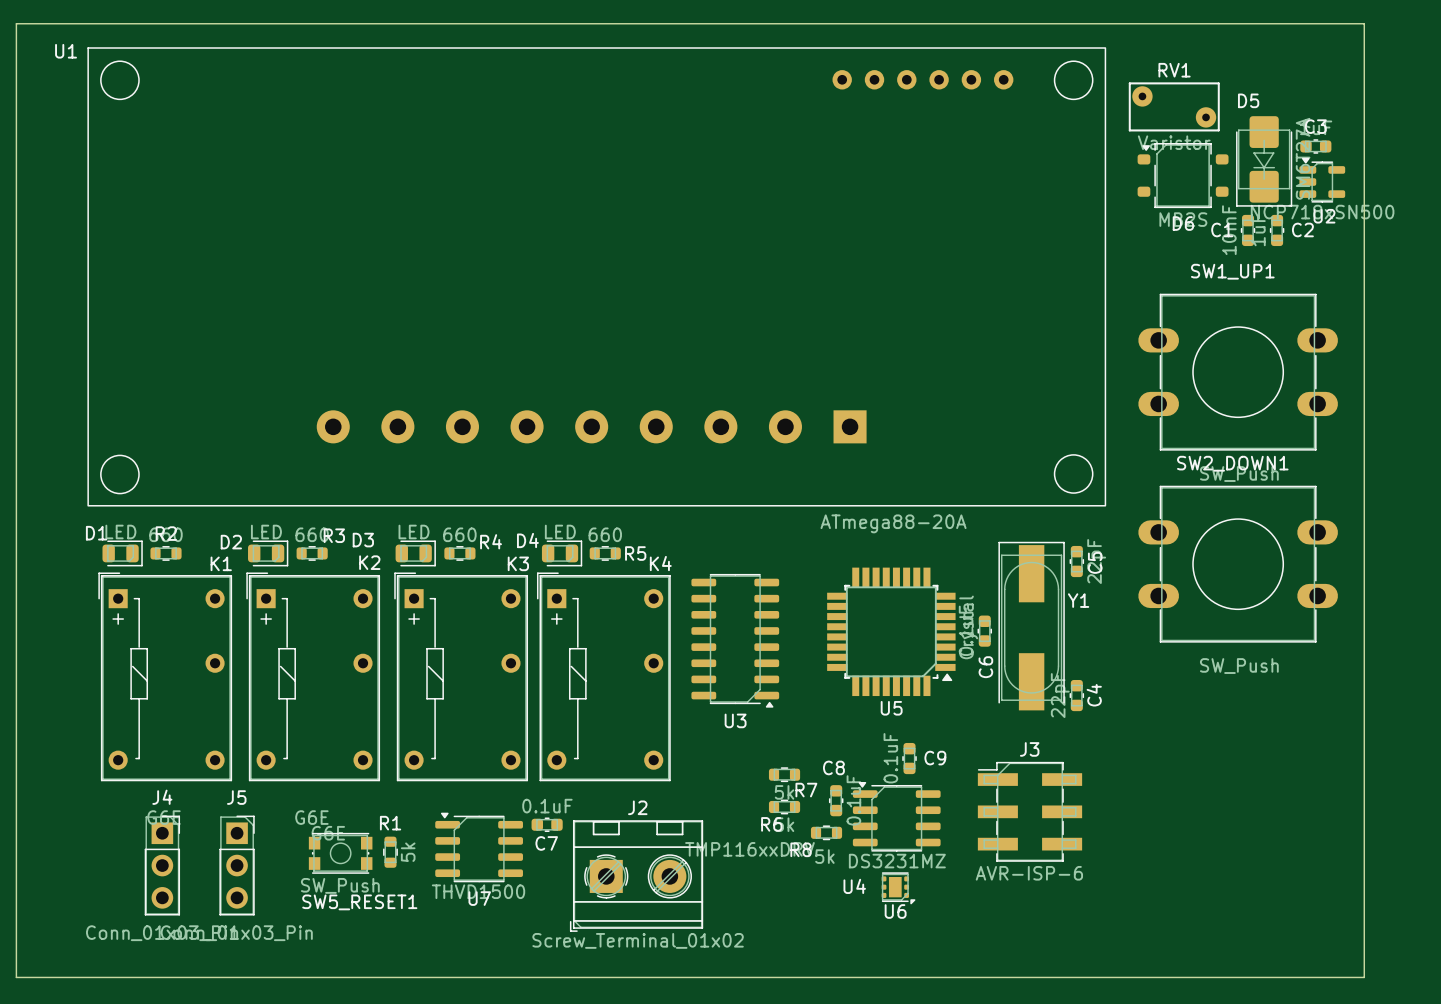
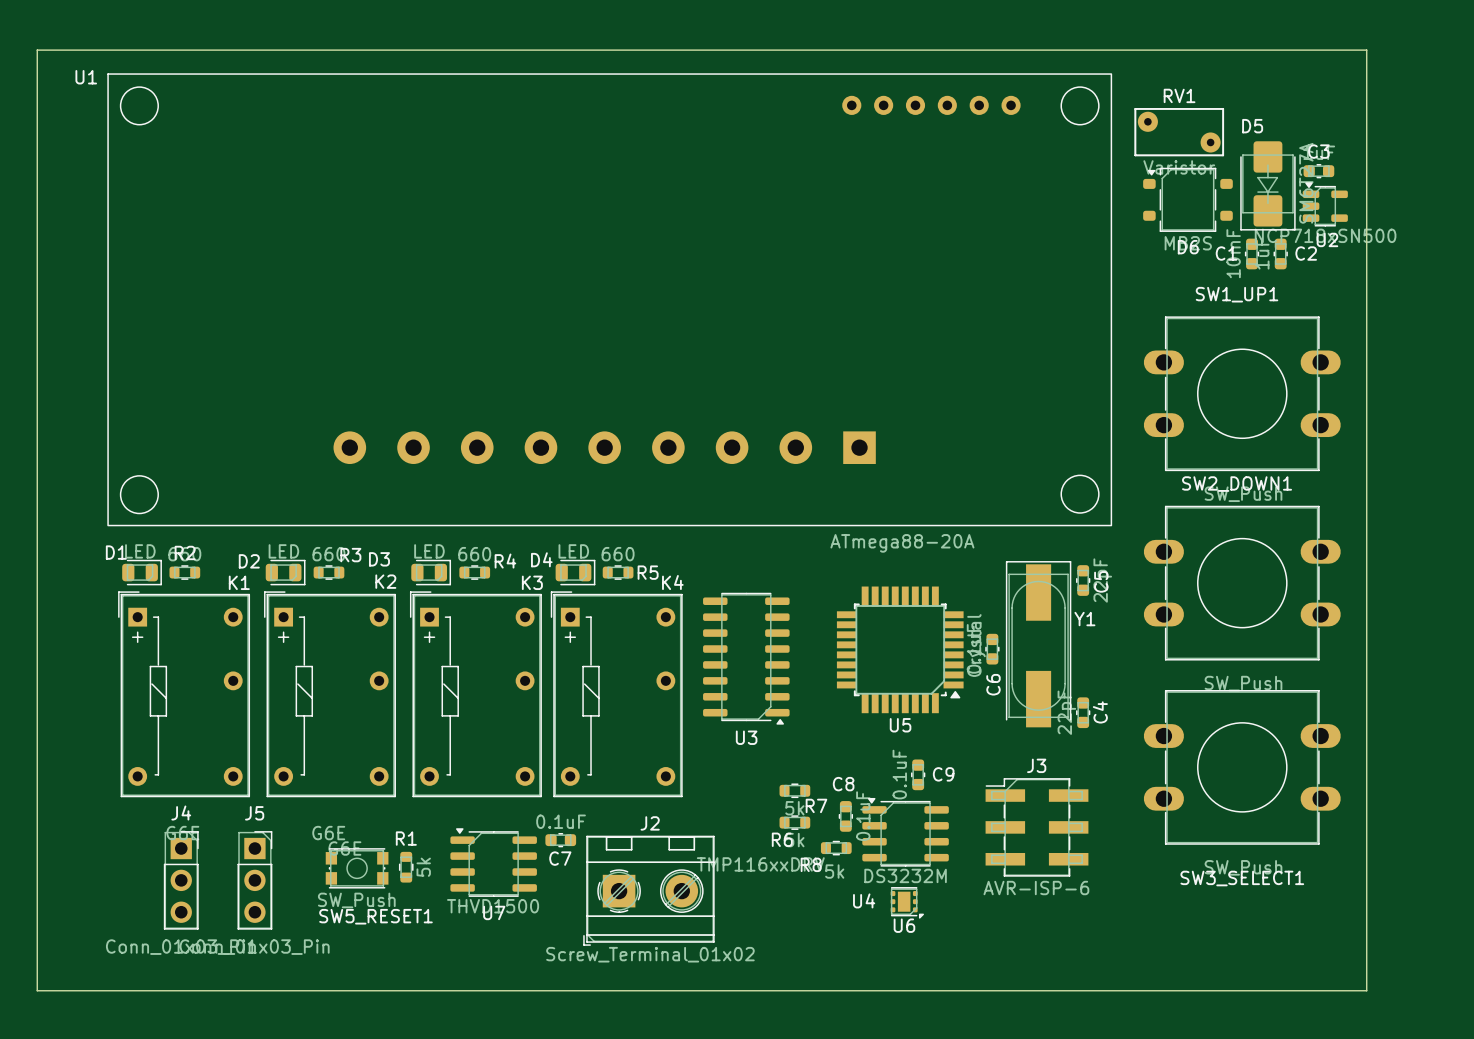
SW3_SELECT1: none -> SW_Push (1242, 767)
U4 value: DS3231MZ (897, 861) -> DS3232M (905, 875)

